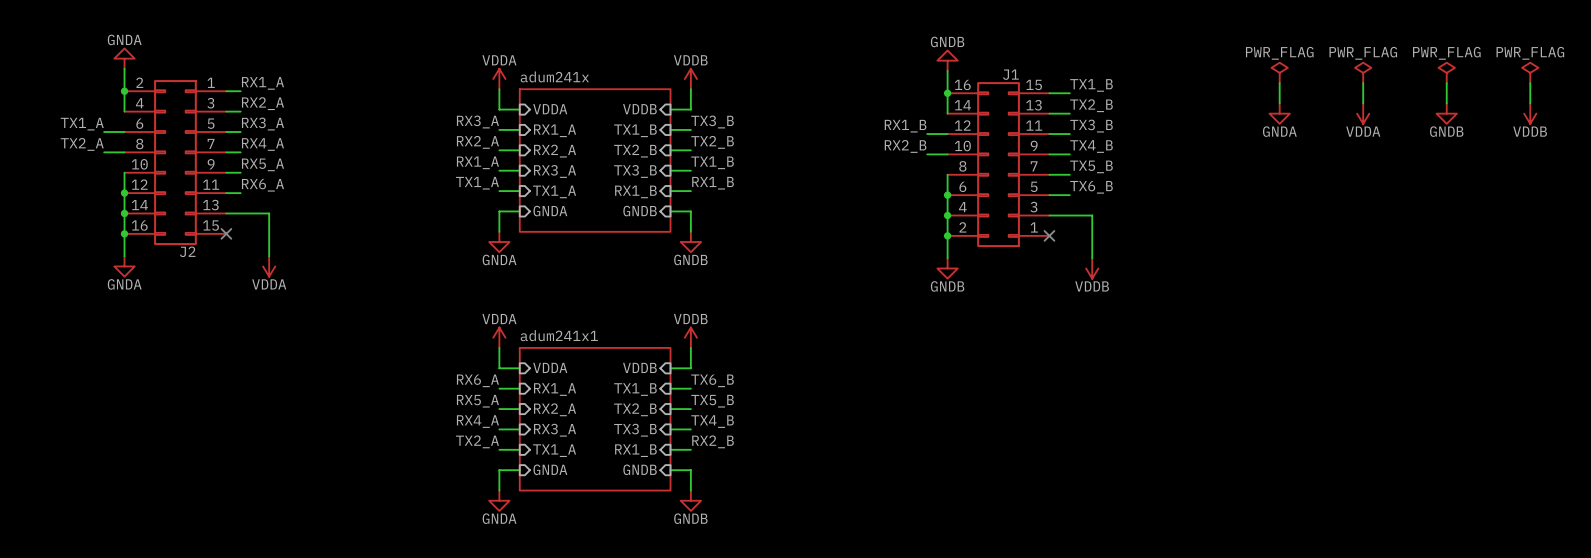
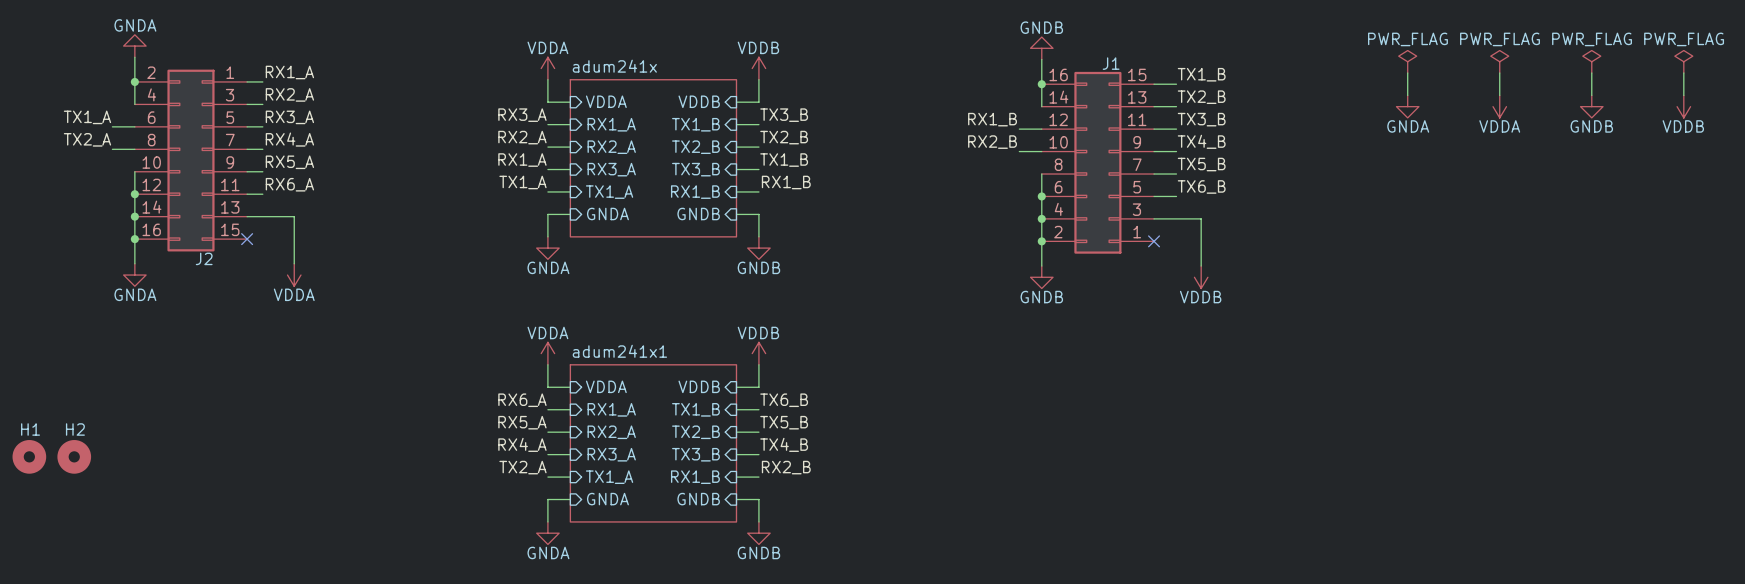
H1: none -> (29, 456)
H2: none -> (74, 456)

